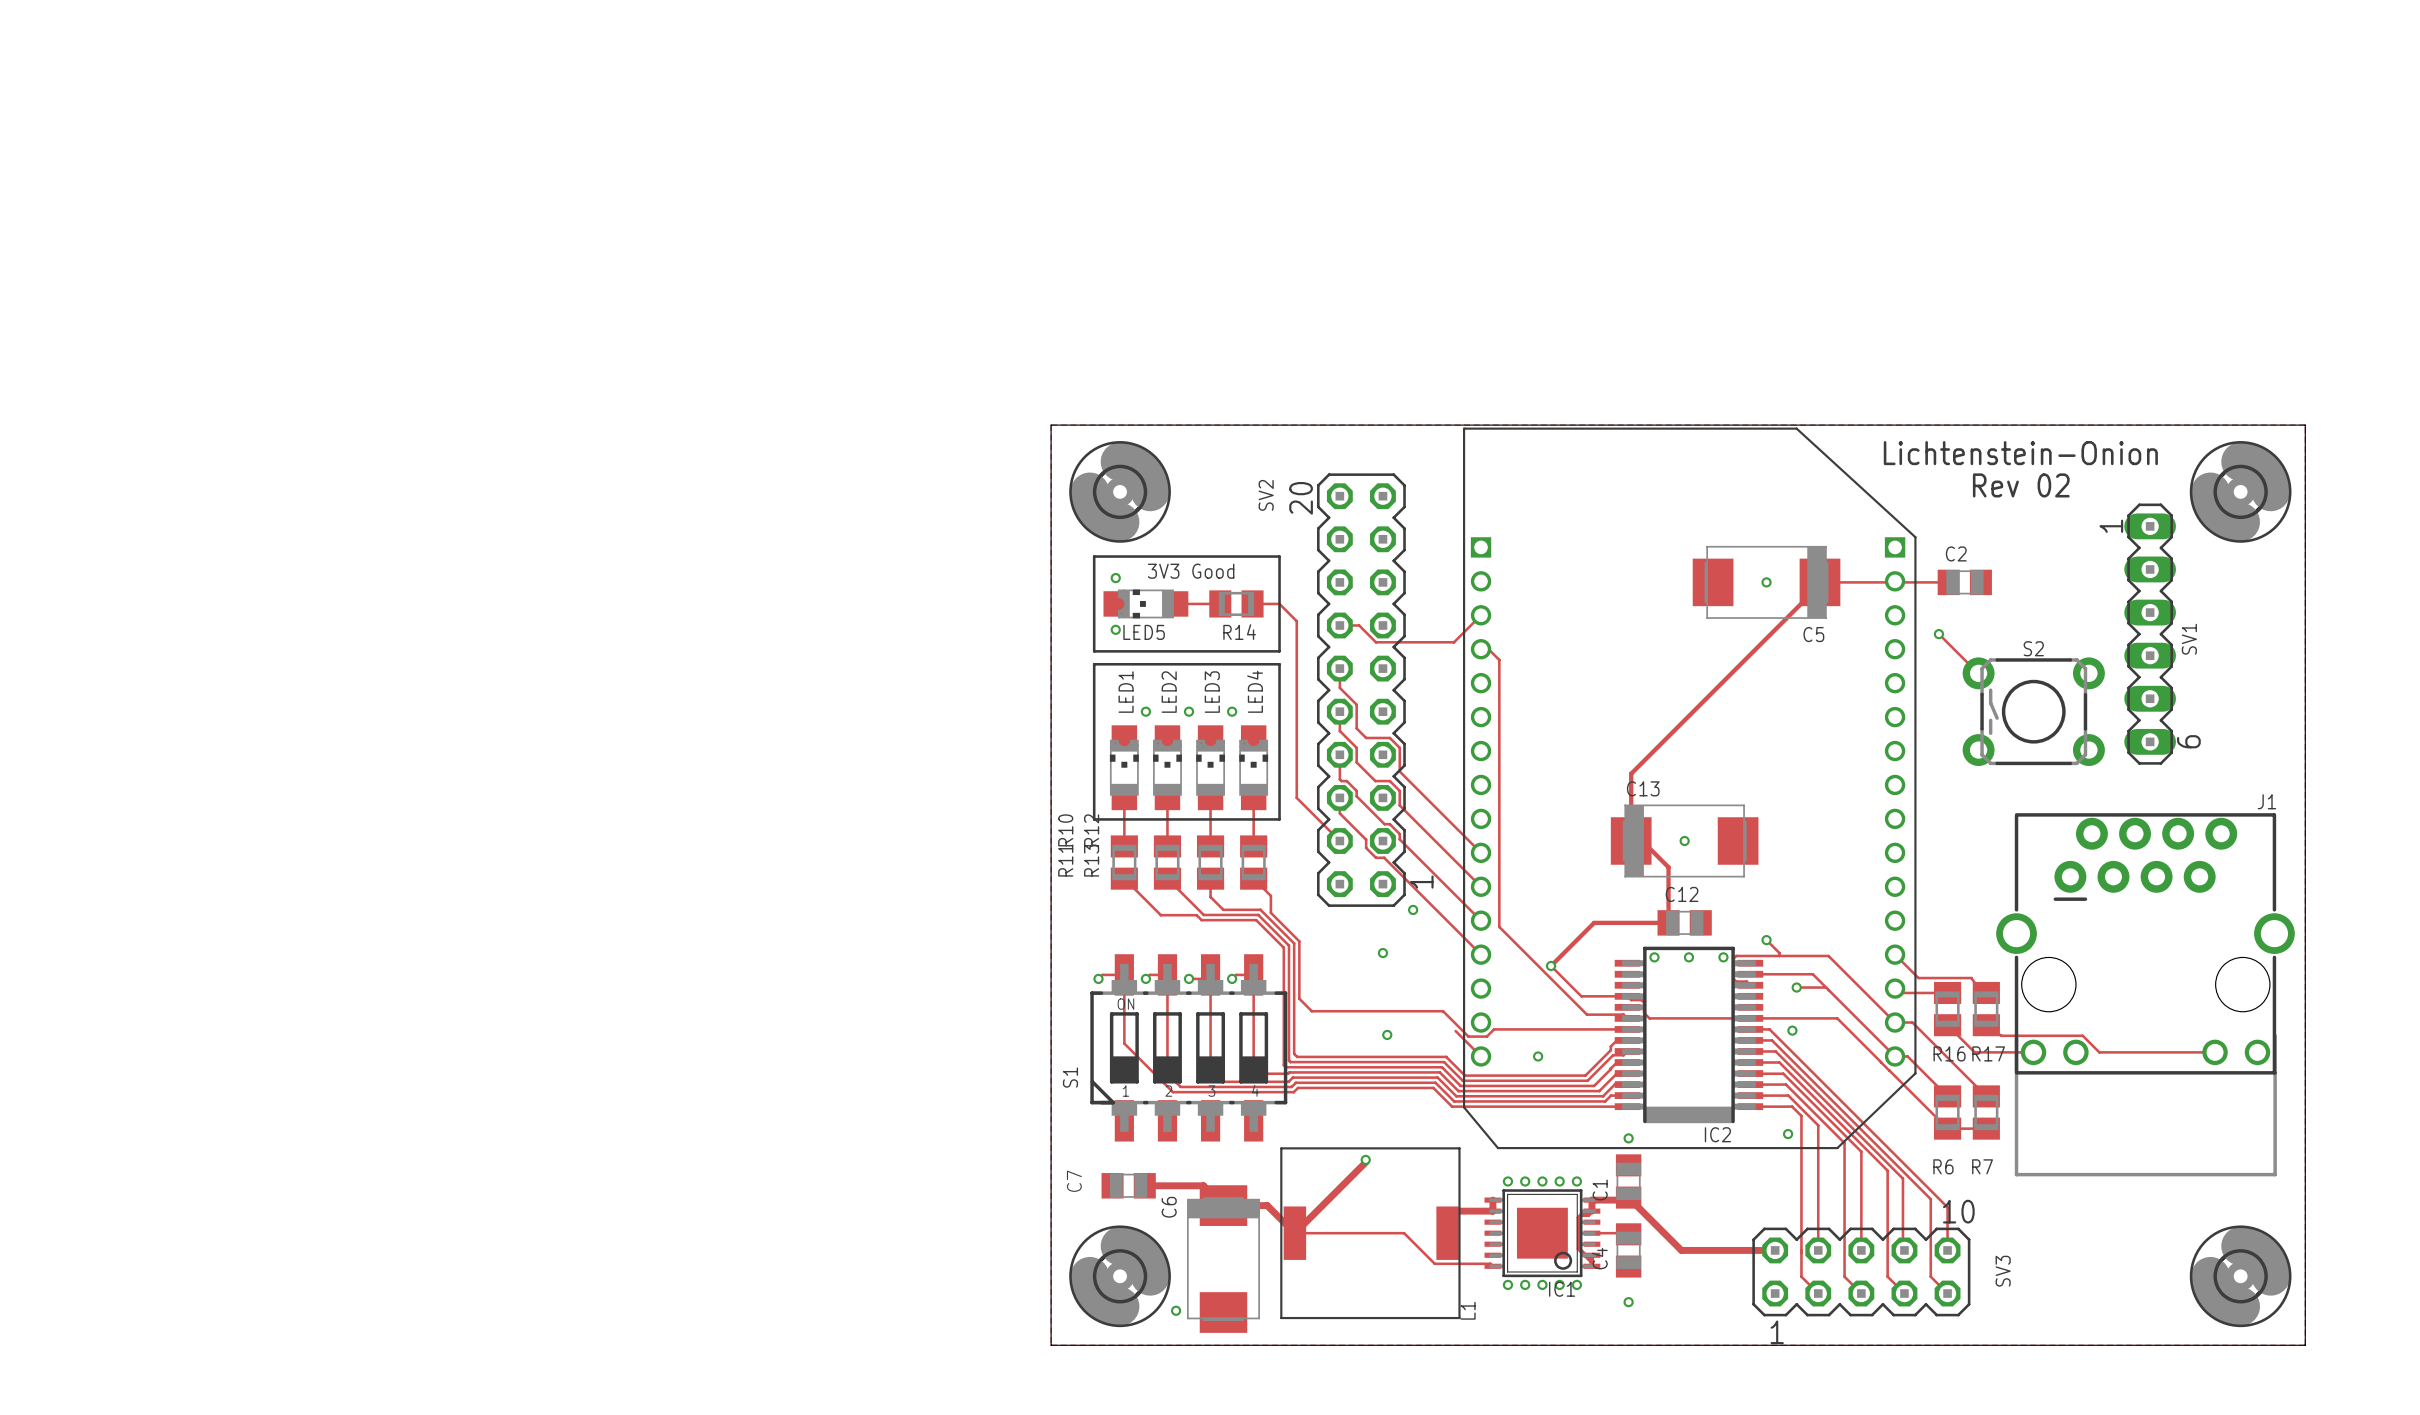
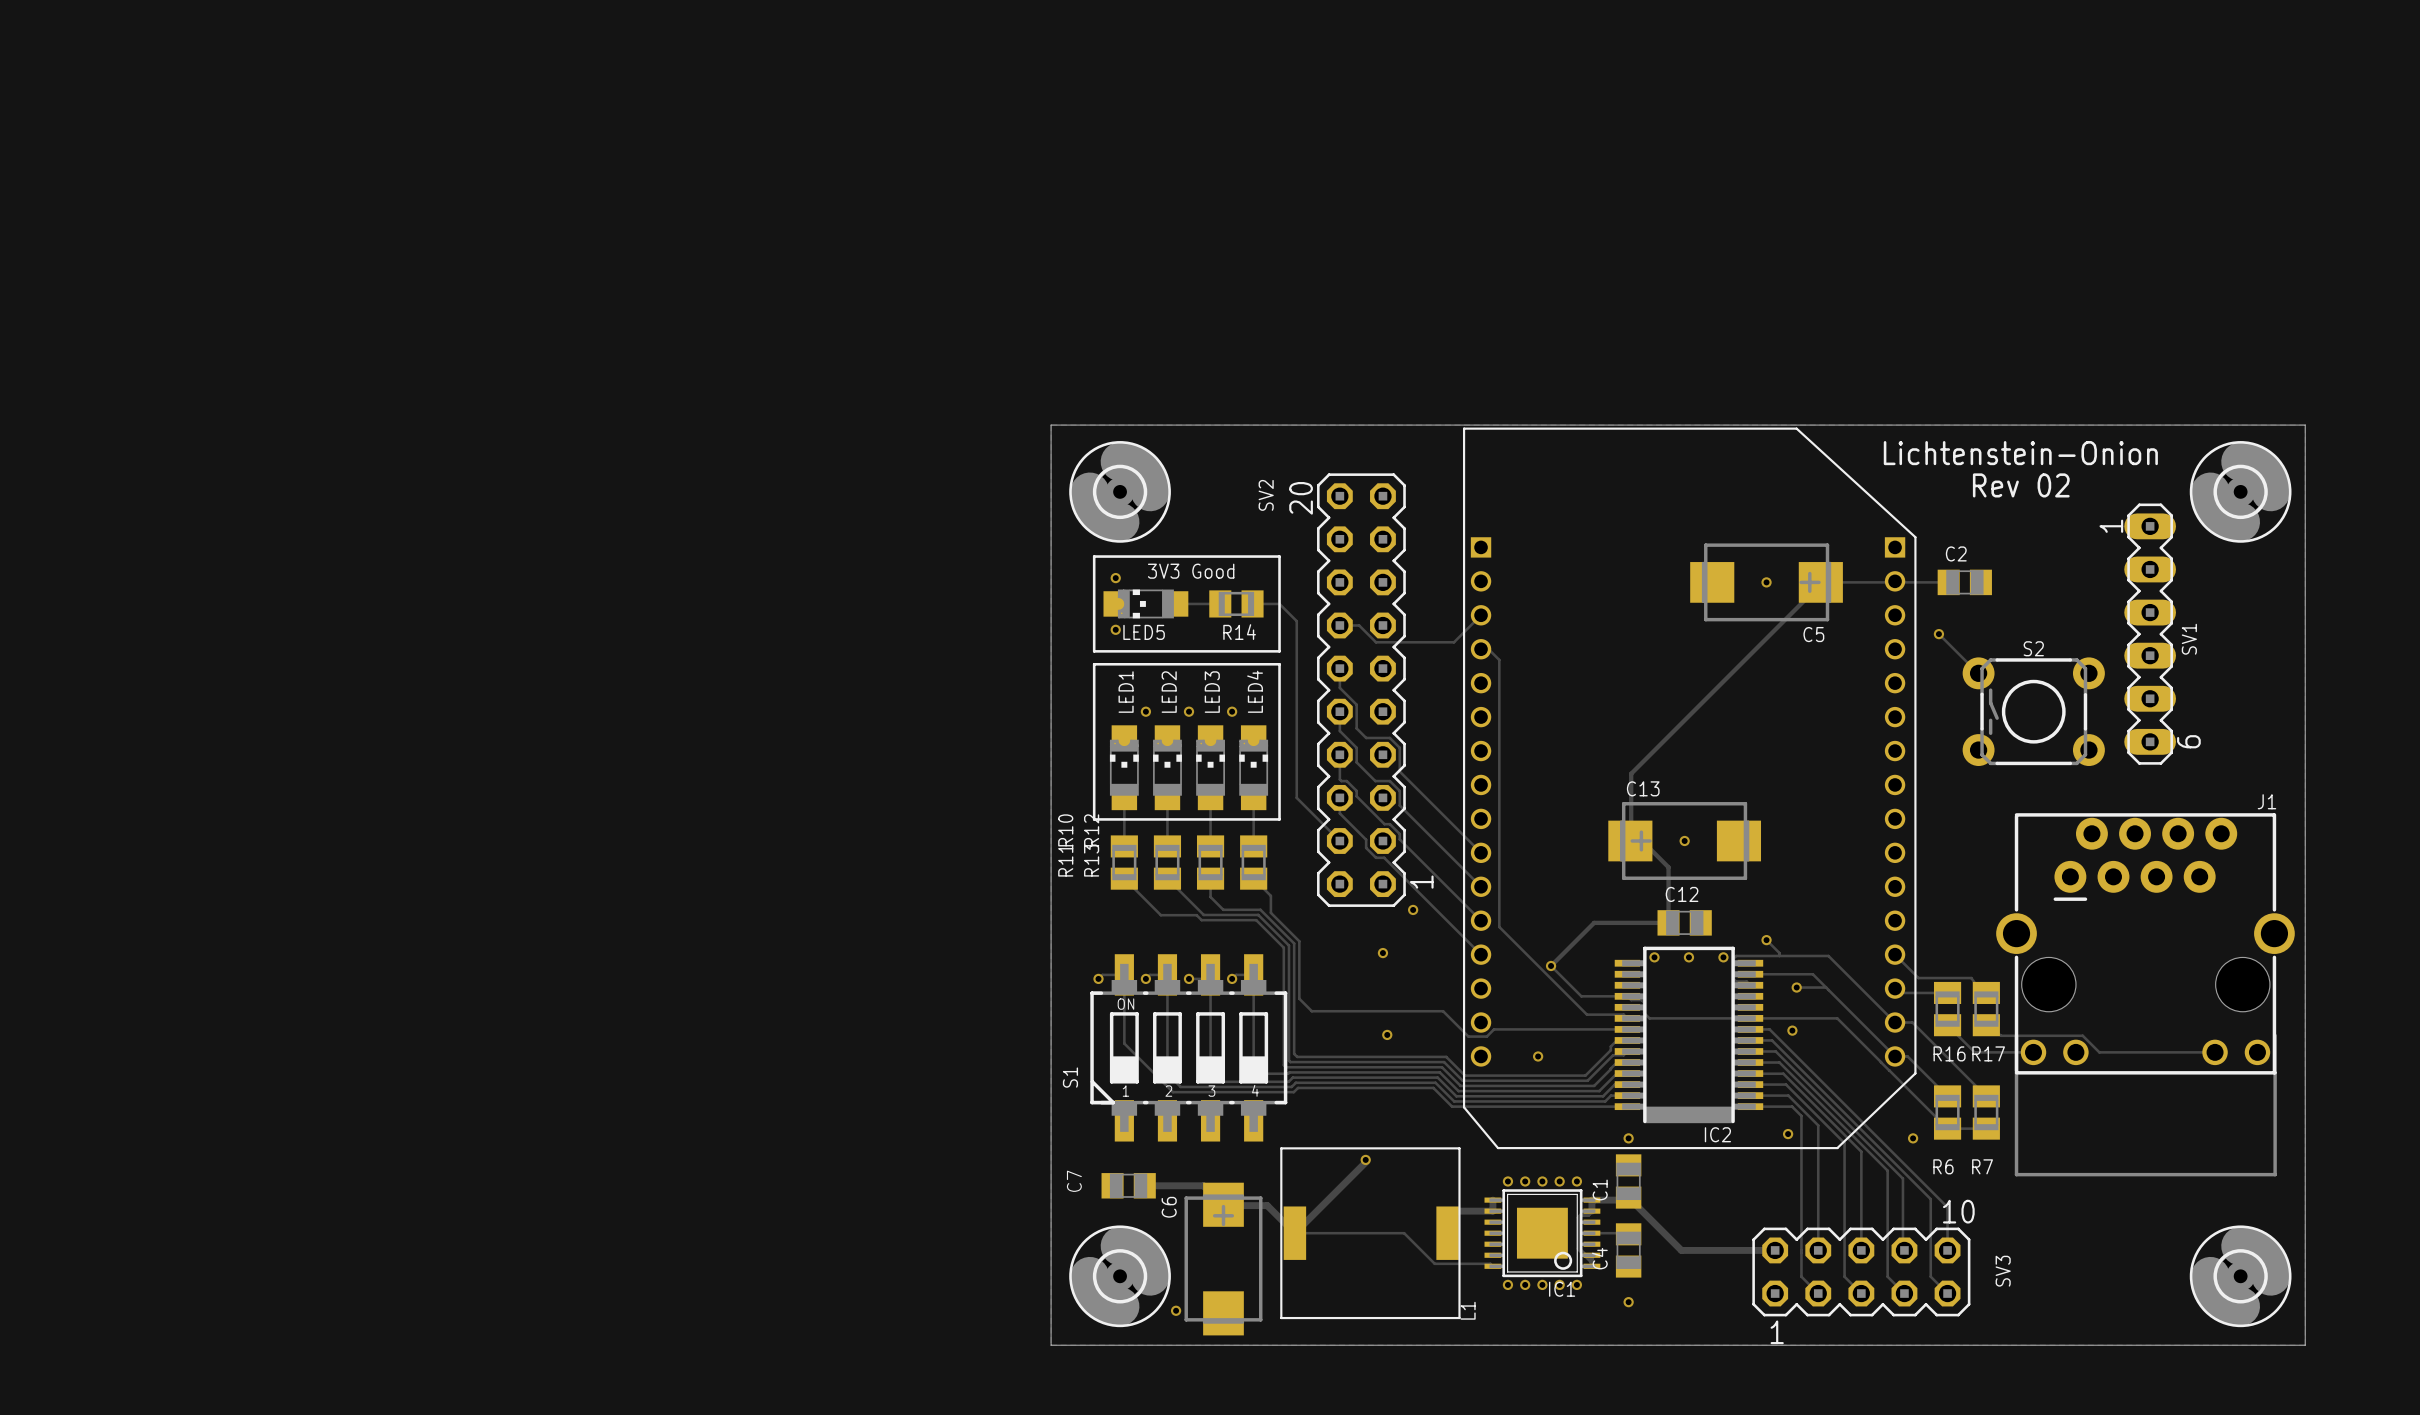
C5 footprint: [1692, 545, 1841, 619] -> [1690, 543, 1843, 622]
C13 footprint: [1610, 804, 1759, 878] -> [1608, 802, 1762, 880]
track: (1455, 1031) (1481, 1056) -> none
via: none -> (1913, 1138)
C6 footprint: [1186, 1185, 1260, 1333] -> [1184, 1182, 1263, 1336]

